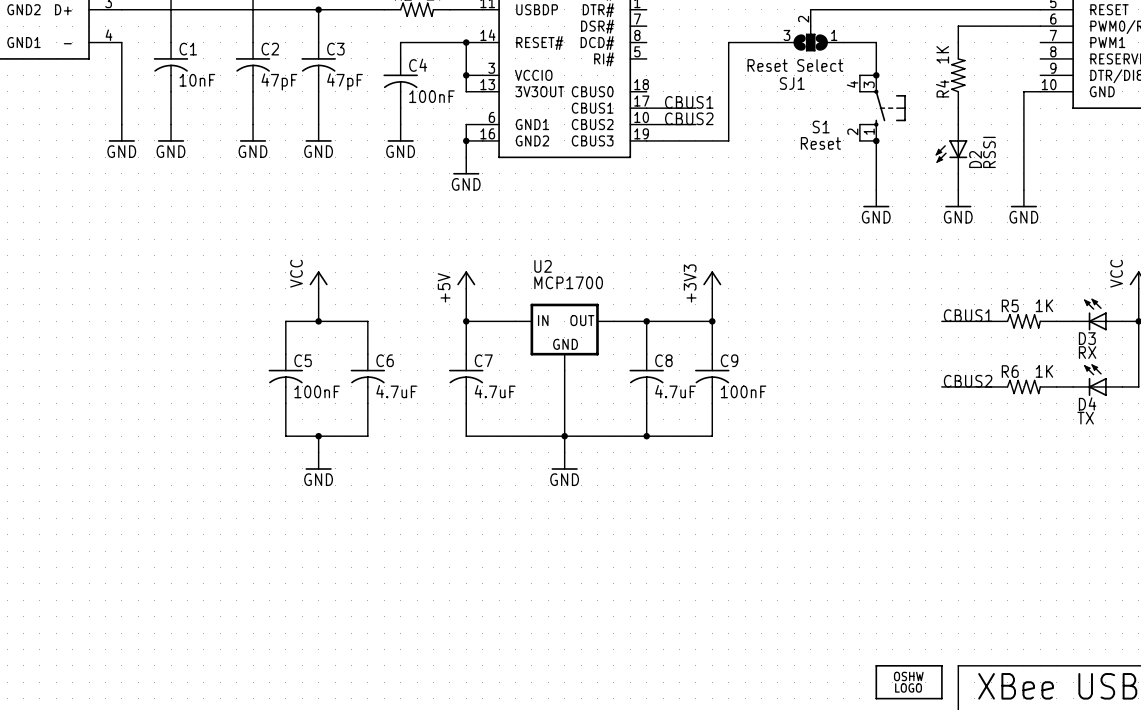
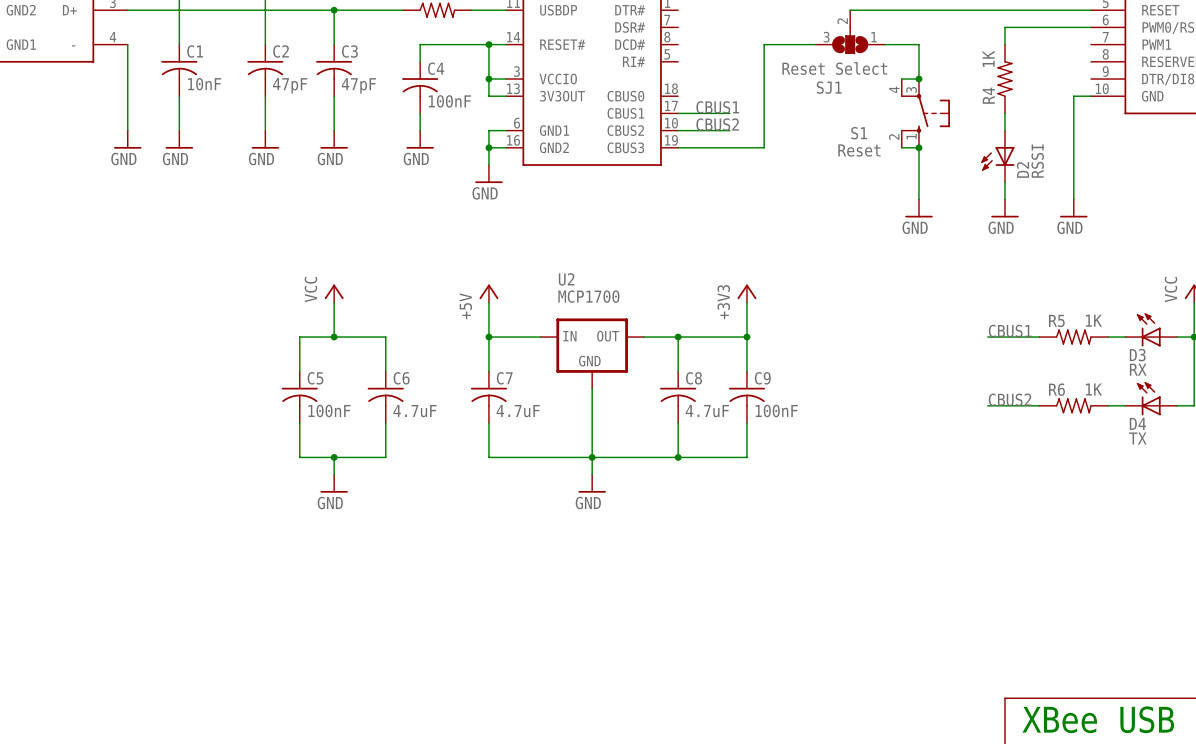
part: (909, 682) -> none

